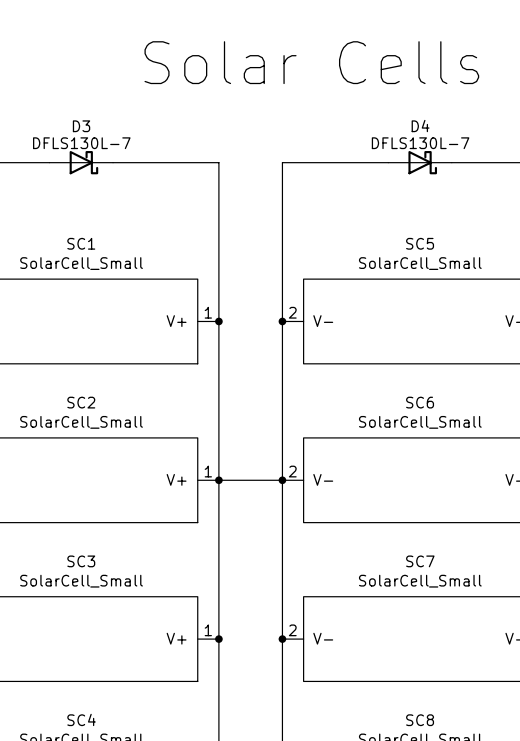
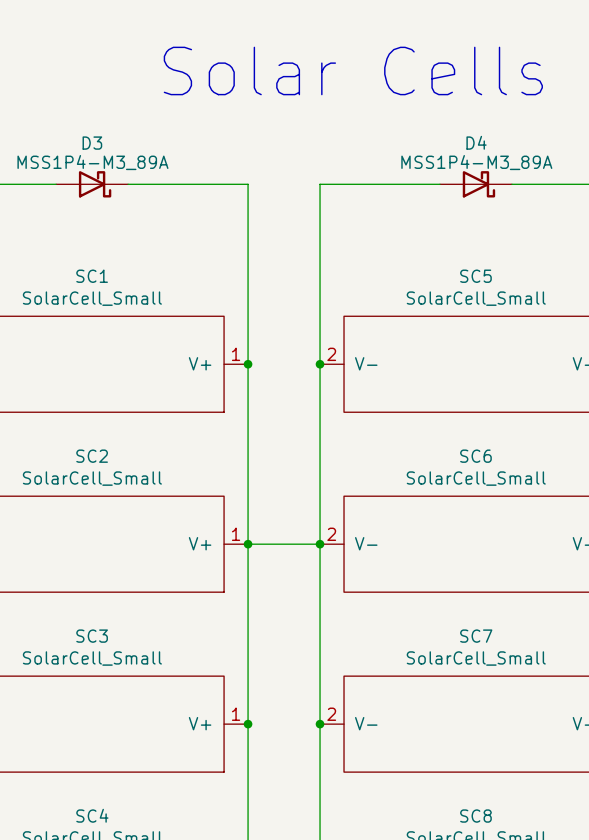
D3 value: DFLS130L-7 (81, 143) -> MSS1P4-M3_89A (92, 162)
D4 value: DFLS130L-7 (420, 143) -> MSS1P4-M3_89A (476, 162)

